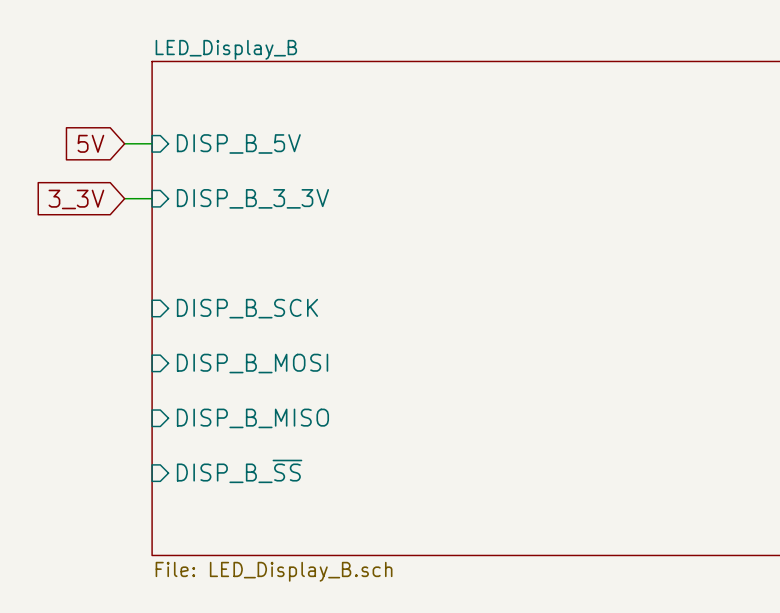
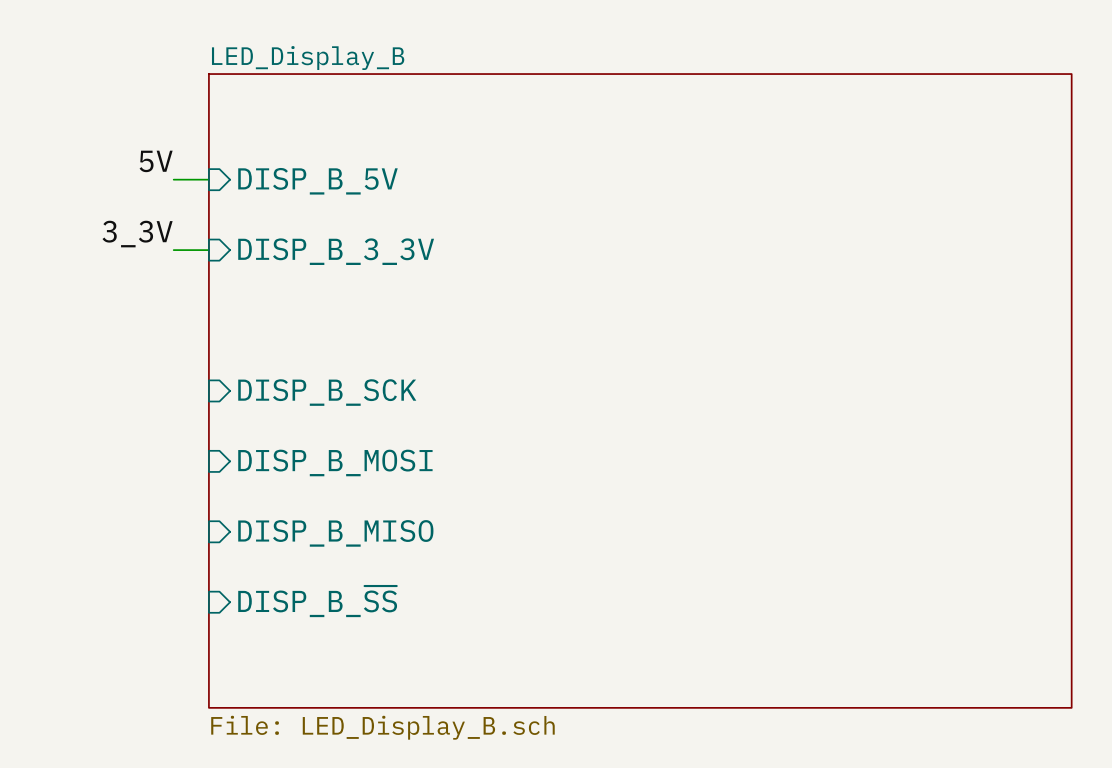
label: none -> 5V (156, 161)
global label: 5V (90, 143) -> none
label: none -> 3_3V (137, 234)
global label: 3_3V (76, 199) -> none

